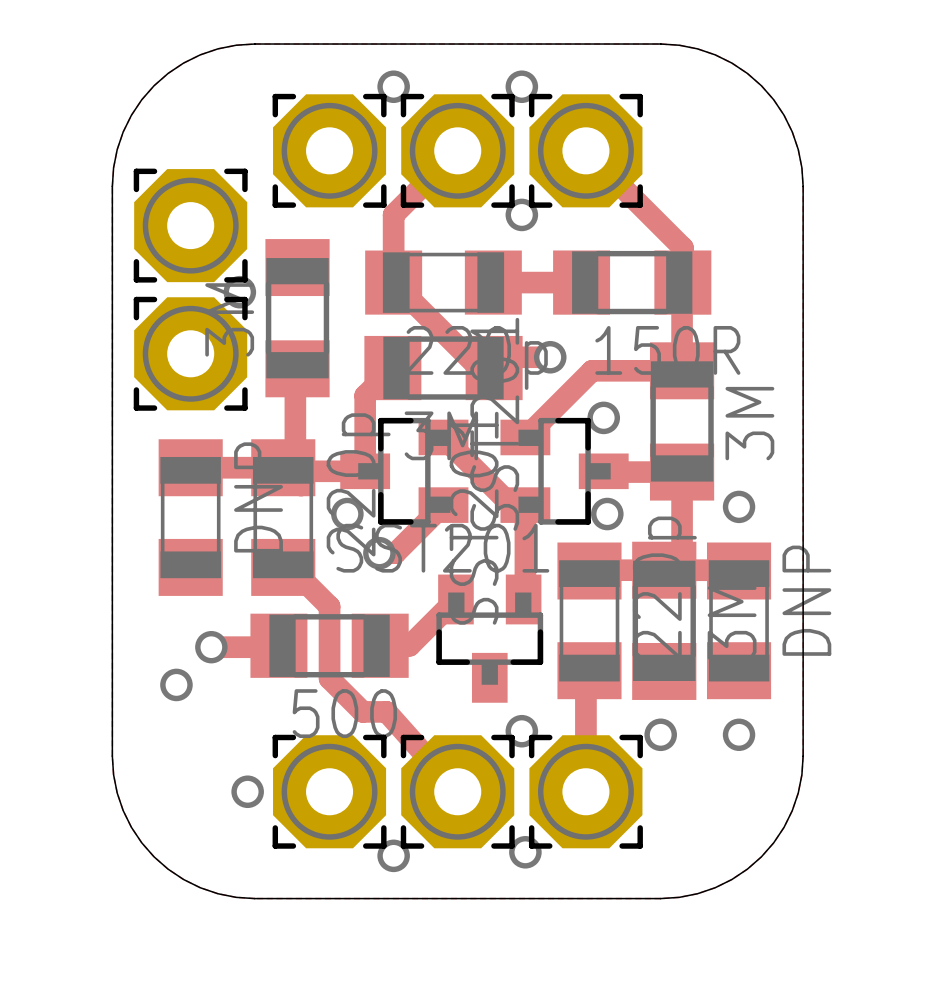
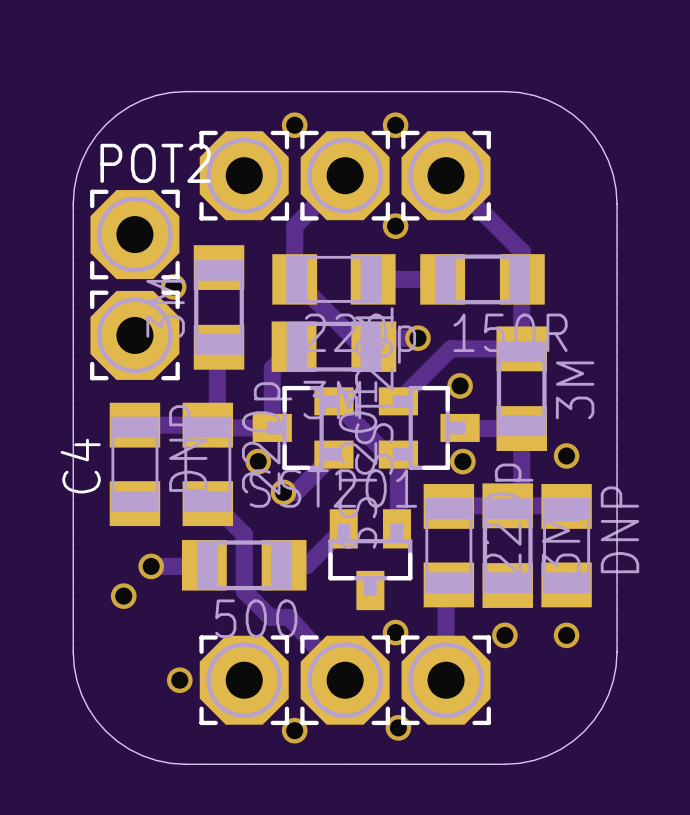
POT2 name: none -> POT2 (155, 163)
C4 name: none -> C4 (80, 466)

